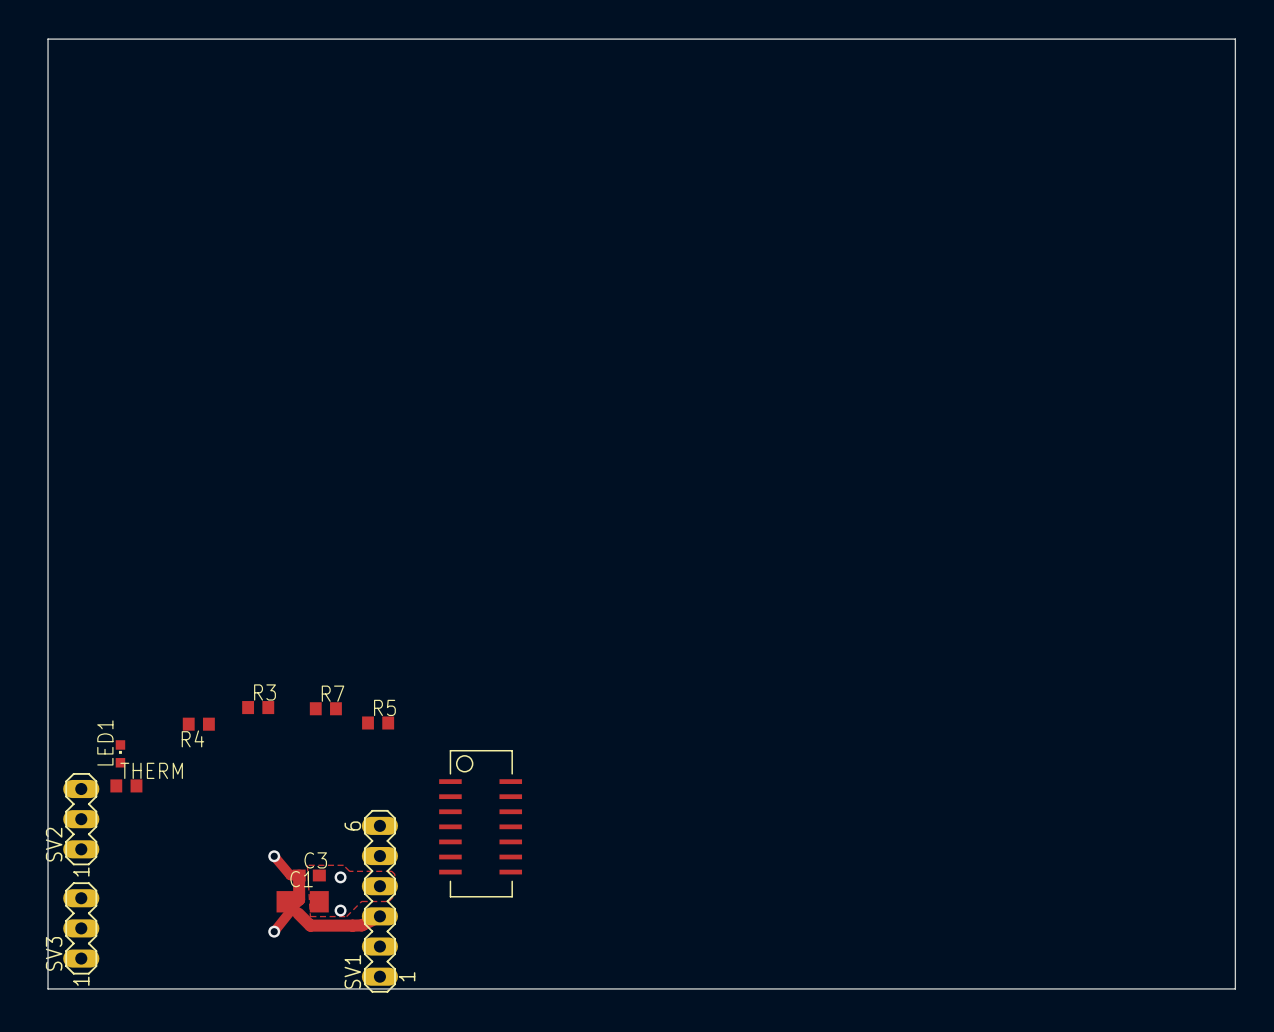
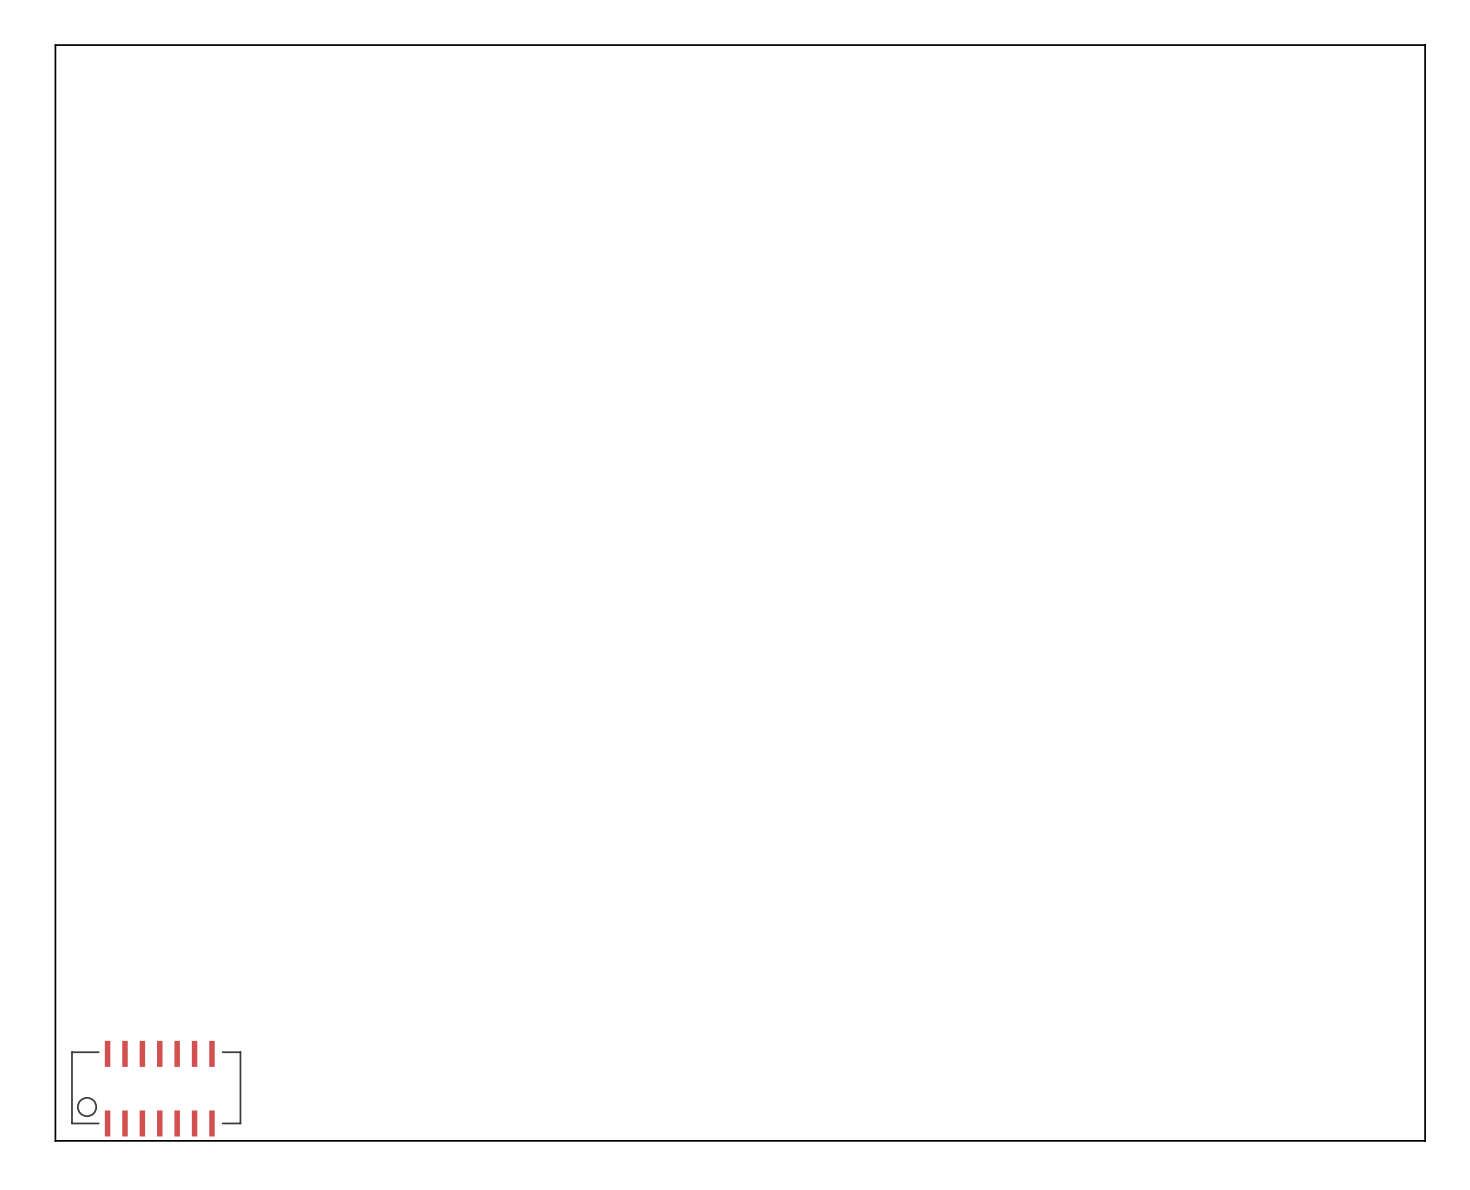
R3: (258, 707) -> none
R7: (325, 708) -> none
R5: (378, 722) -> none
R4: (198, 724) -> none
LED1: (120, 753) -> none
THERM: (126, 785) -> none
SV2: (81, 819) -> none
part: (480, 823) -> none
track: (274, 856) (290, 875) (299, 875) (299, 899) (286, 901) (298, 901) (274, 931) -> none
via: (274, 856) -> none
zone outline: (307, 865) (343, 865) (349, 871) (391, 871) (394, 874) (394, 895) (388, 901) (361, 901) (346, 916) (310, 916) (307, 865) -> none
C3: (309, 875) -> none
via: (340, 877) -> none
C1: (302, 901) -> none
SV1: (379, 901) -> none
via: (340, 910) -> none
track: (298, 913) (310, 925) (361, 925) (379, 916) -> none
SV3: (81, 928) -> none
via: (274, 931) -> none
part: none -> (156, 1088)

